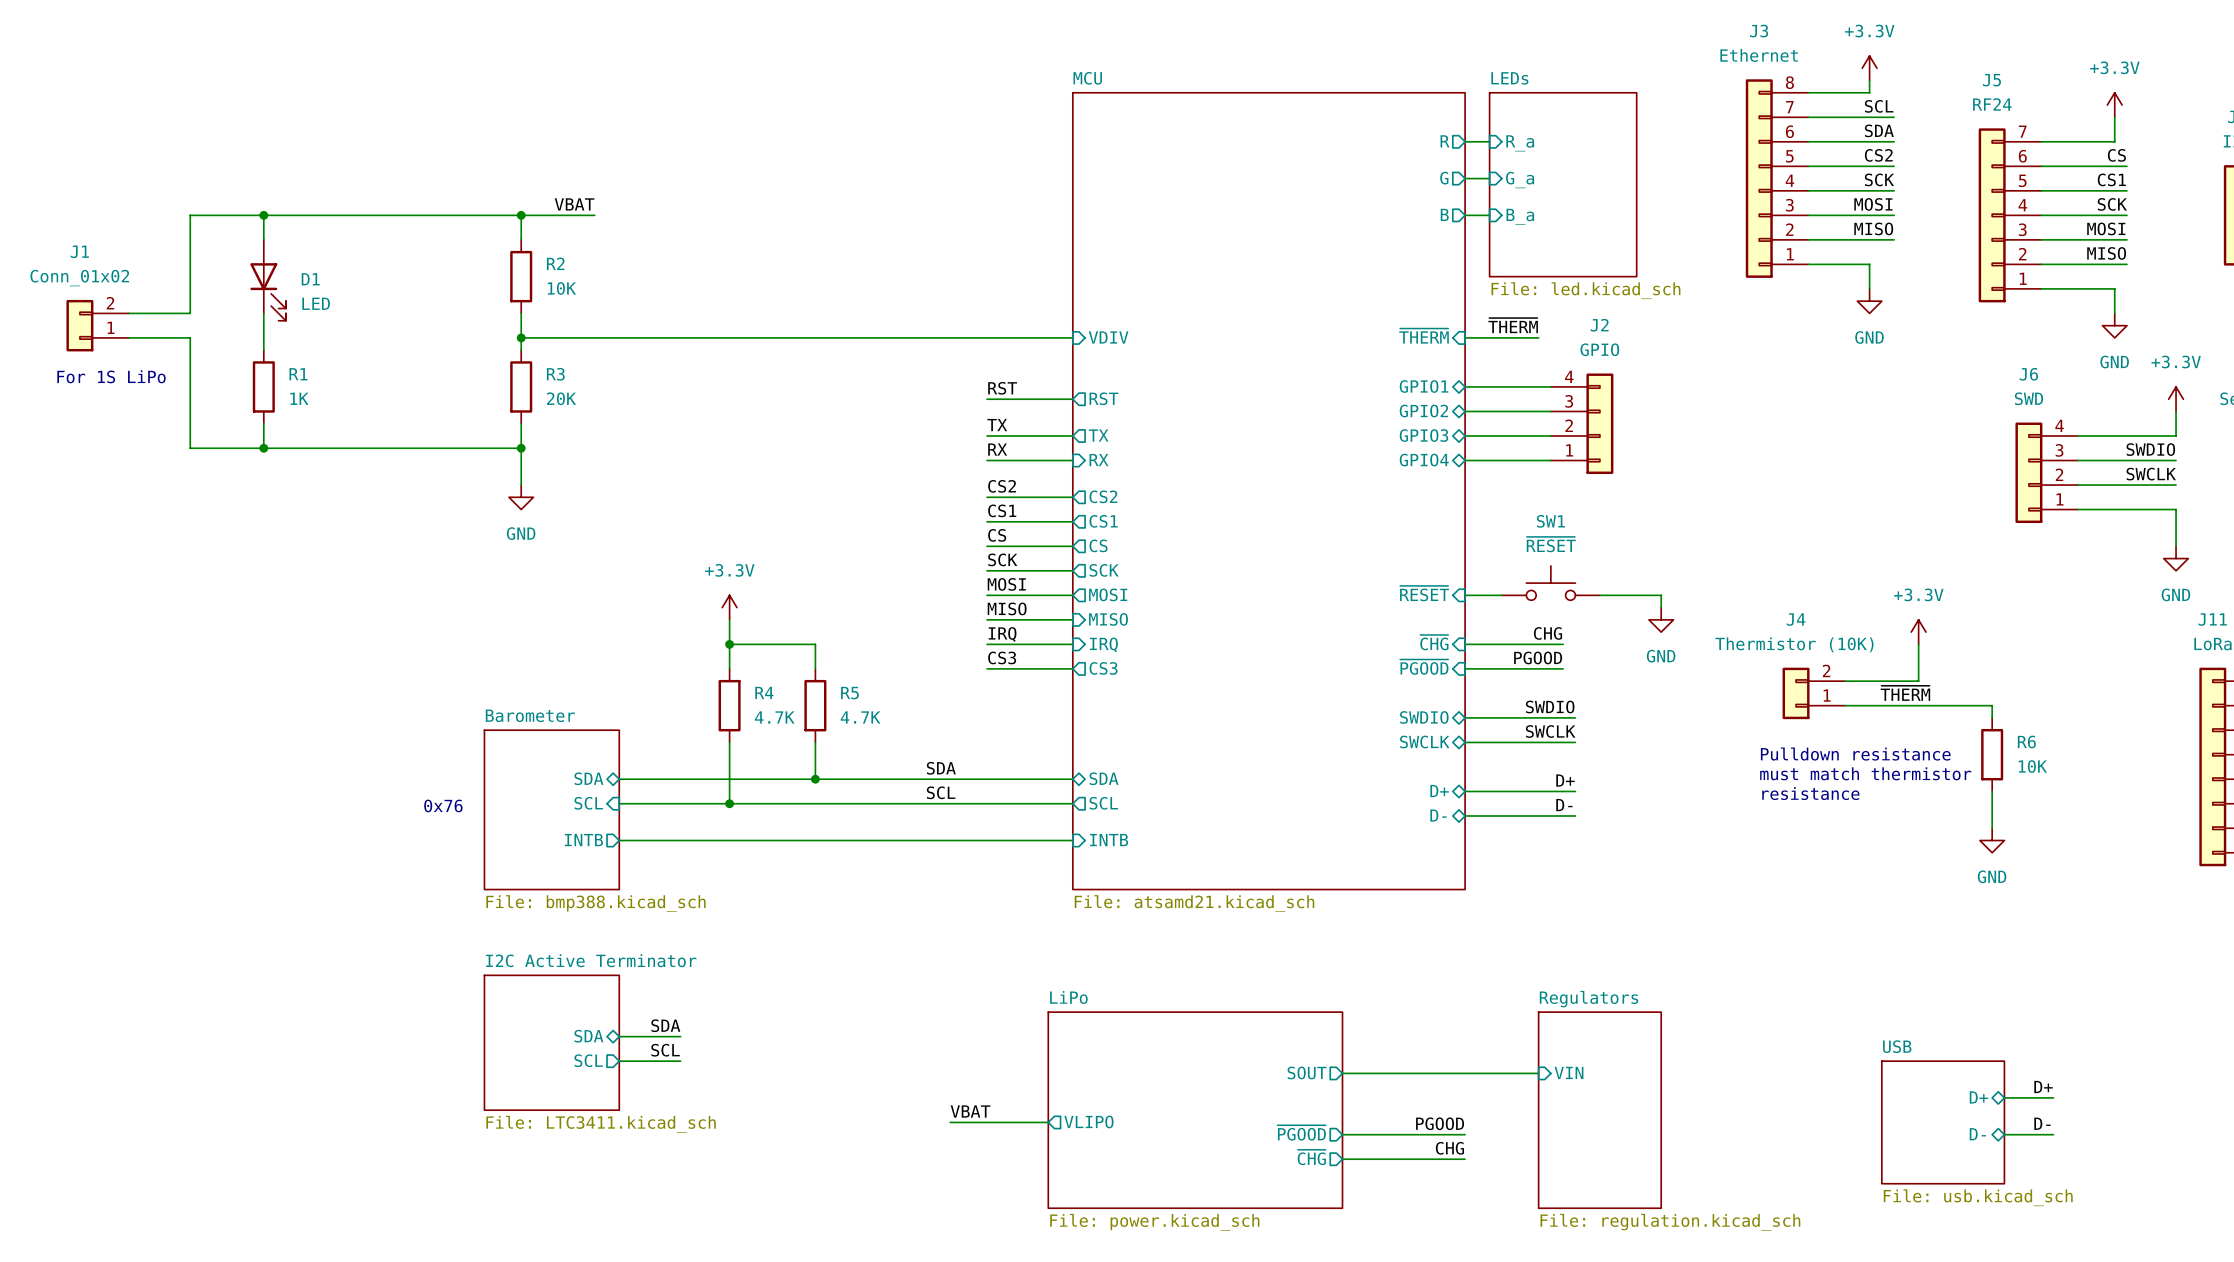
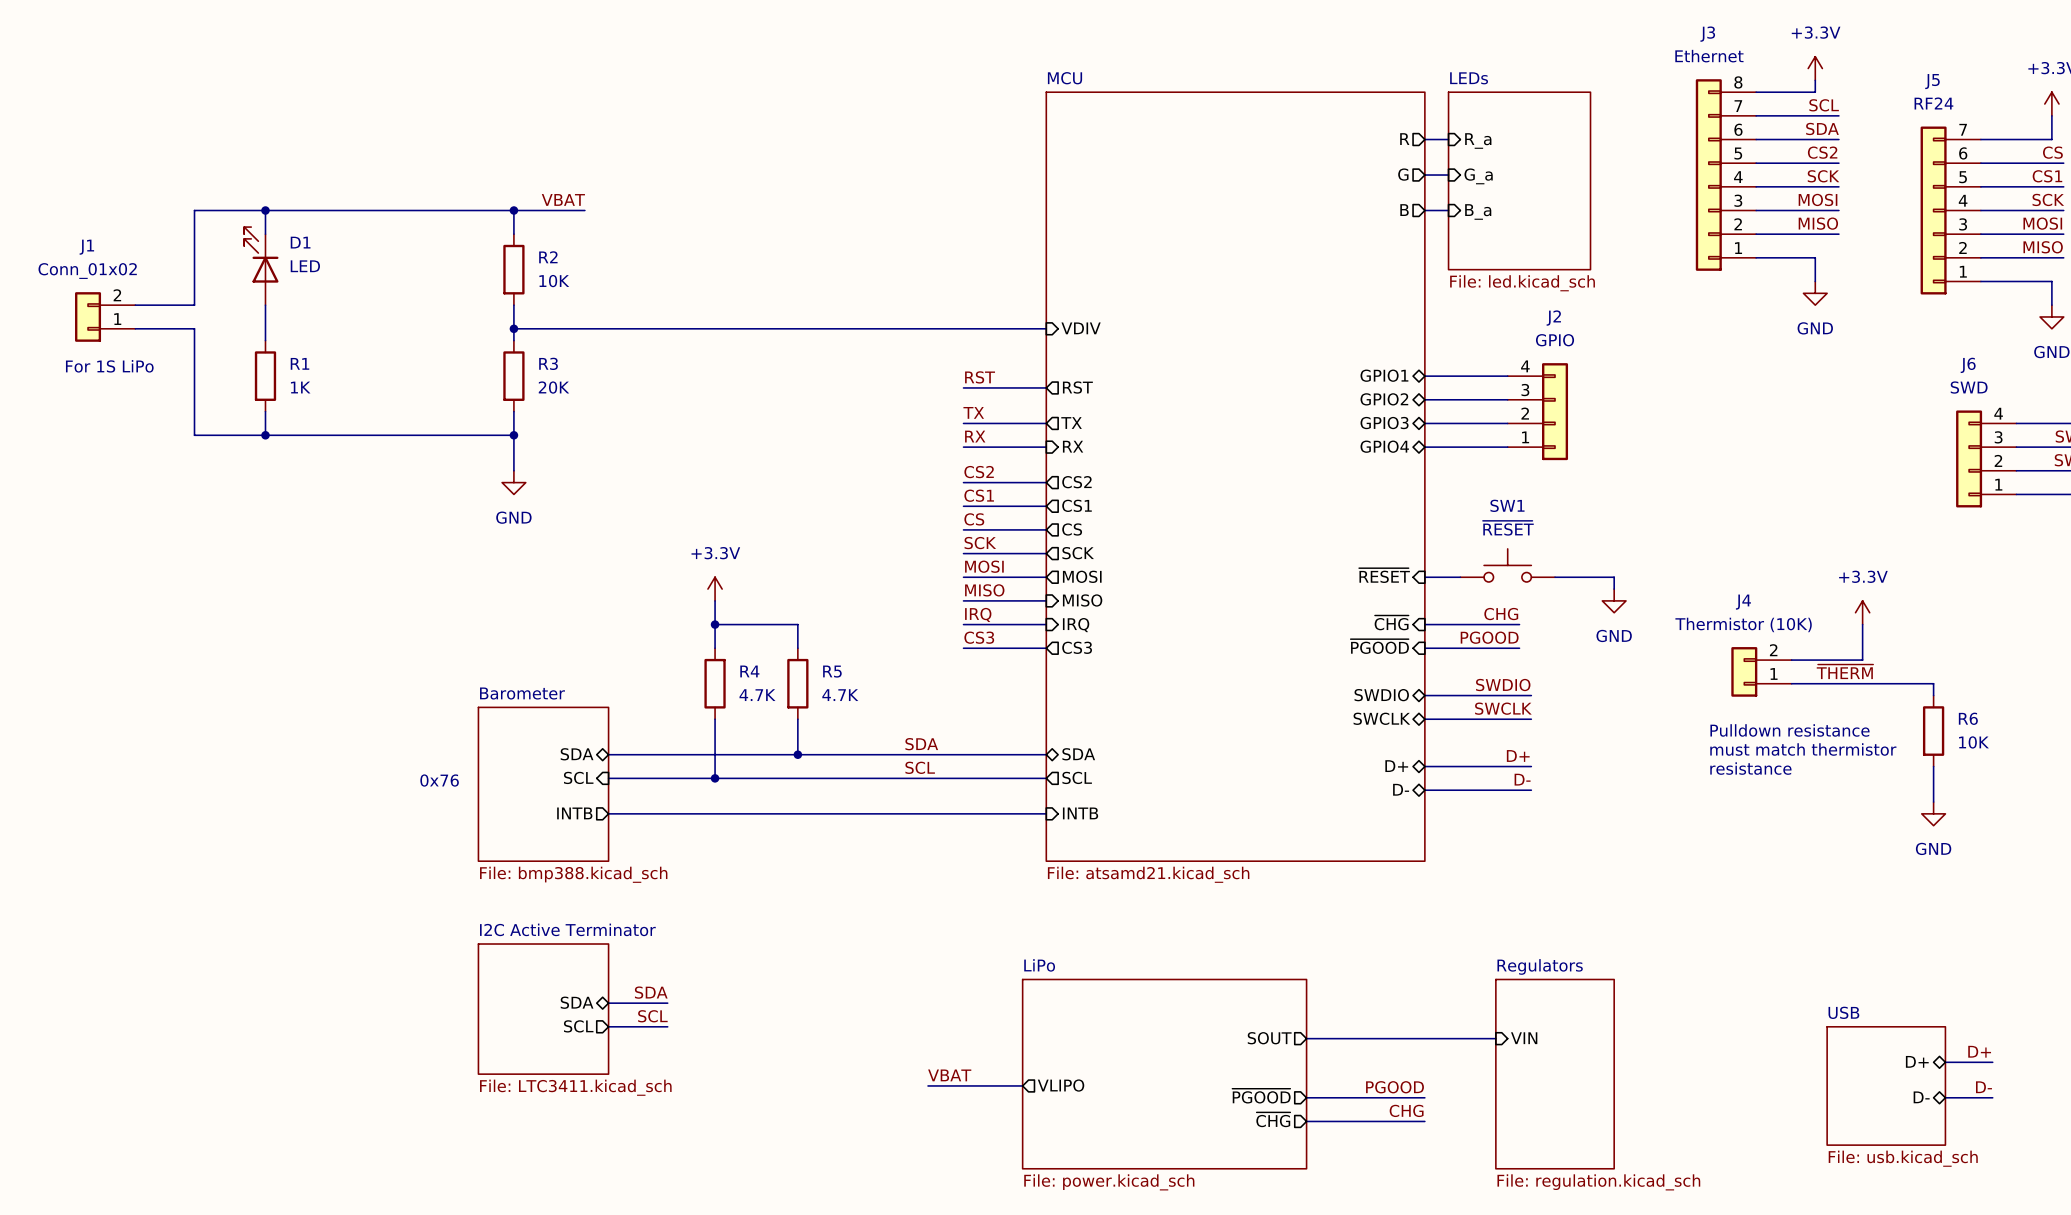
D1 name position: D1 (310, 279) -> D1 (300, 242)
D1 rotation: 0° (268, 291) -> 180° (261, 254)
D1 value position: LED (316, 303) -> LED (305, 266)
label: ~{THERM} (1513, 325) -> none
sheet pin: ~{THERM} (1424, 336) -> none
wire: (1465, 337) (1538, 337) -> none

